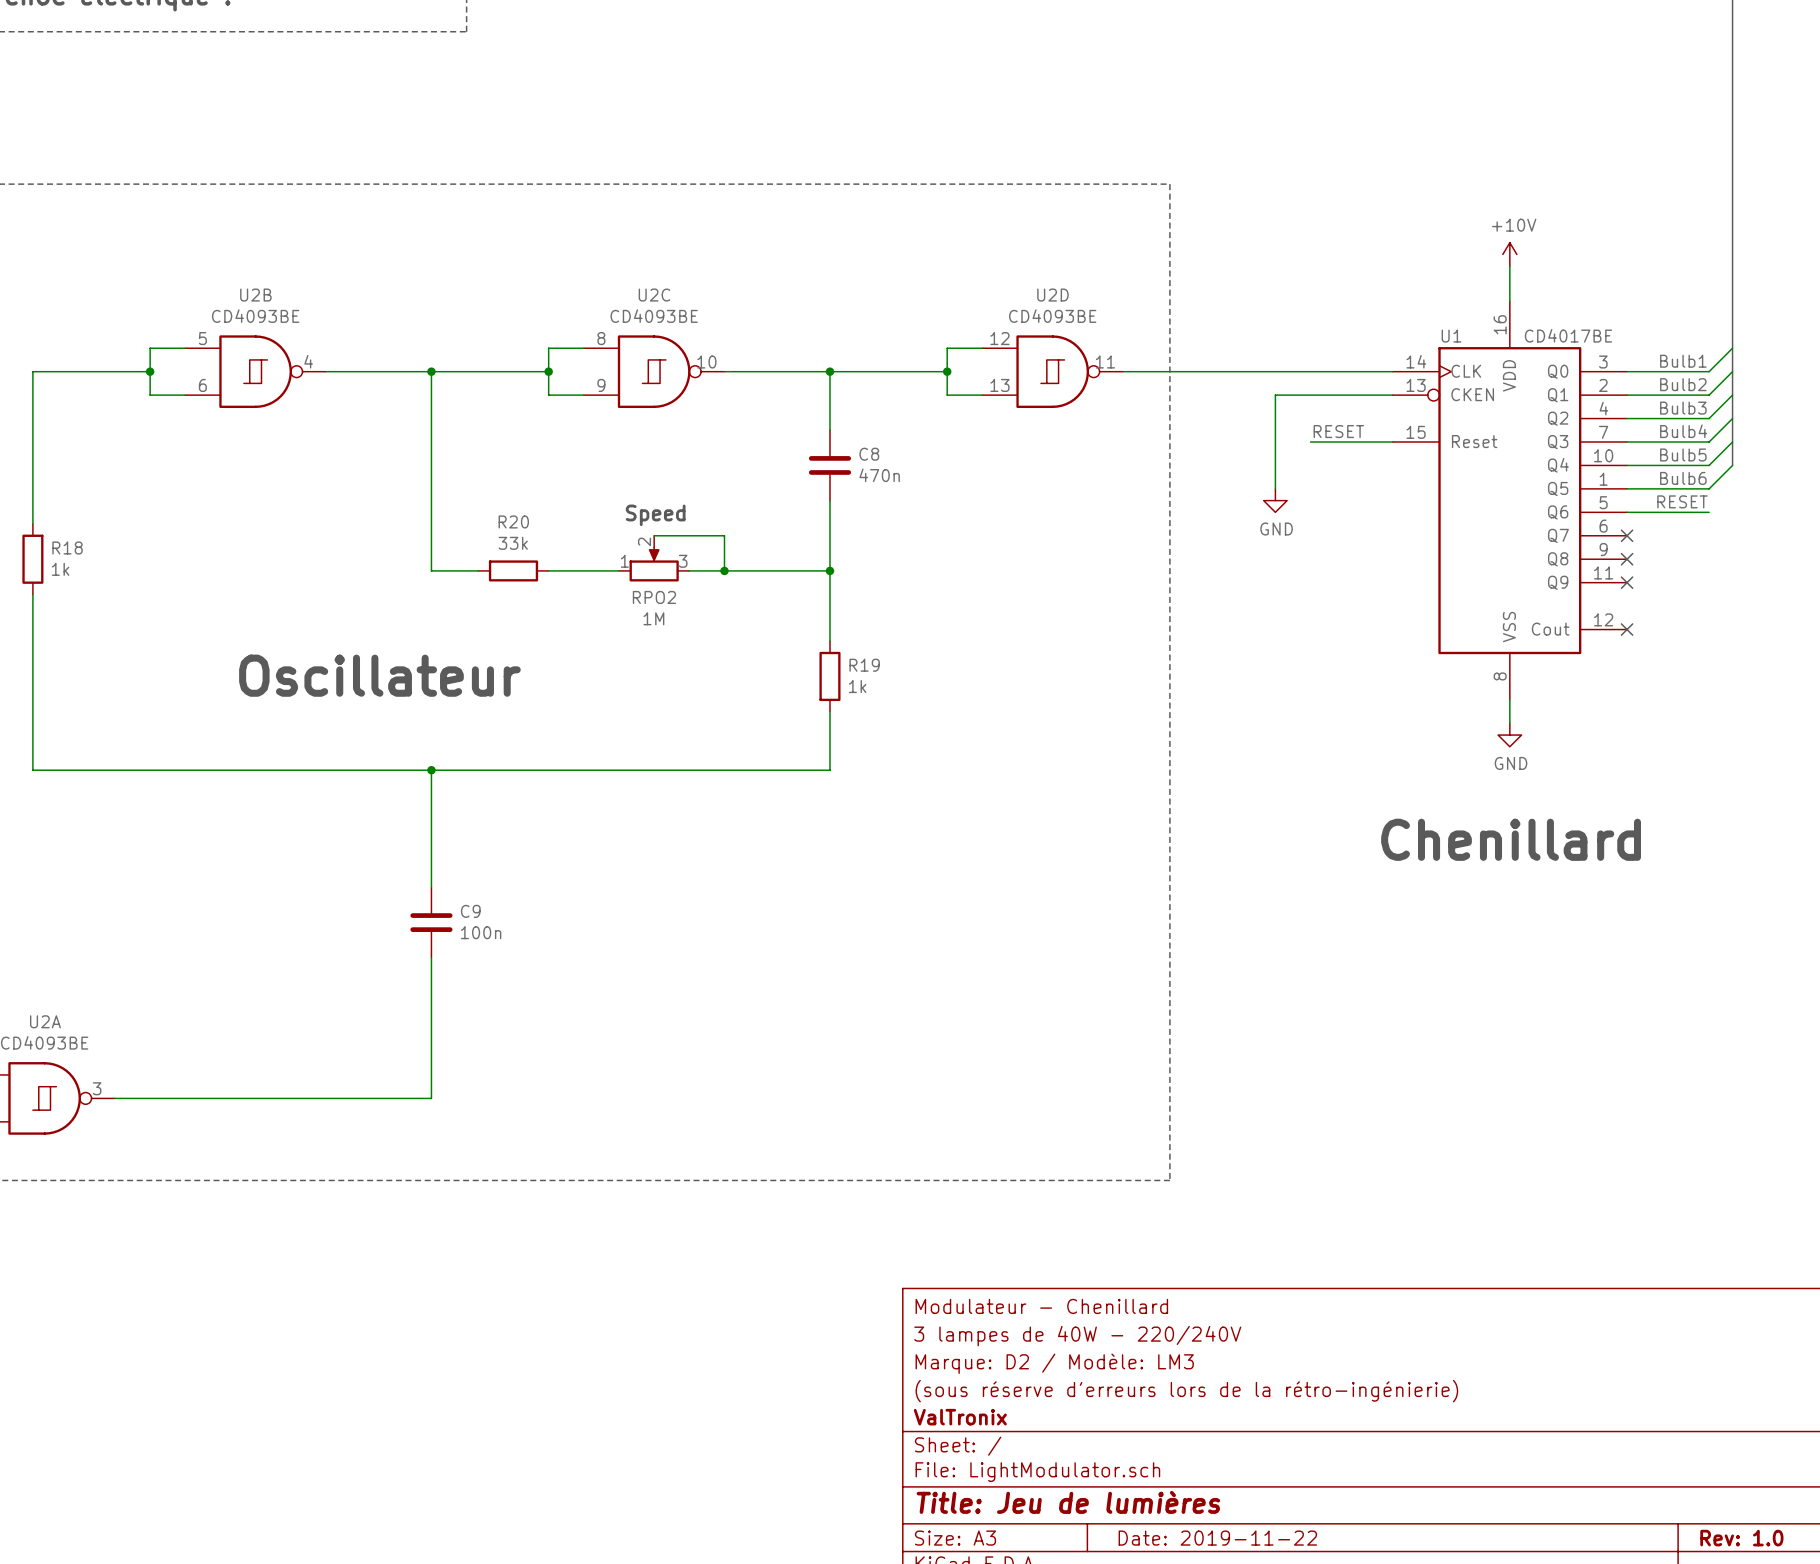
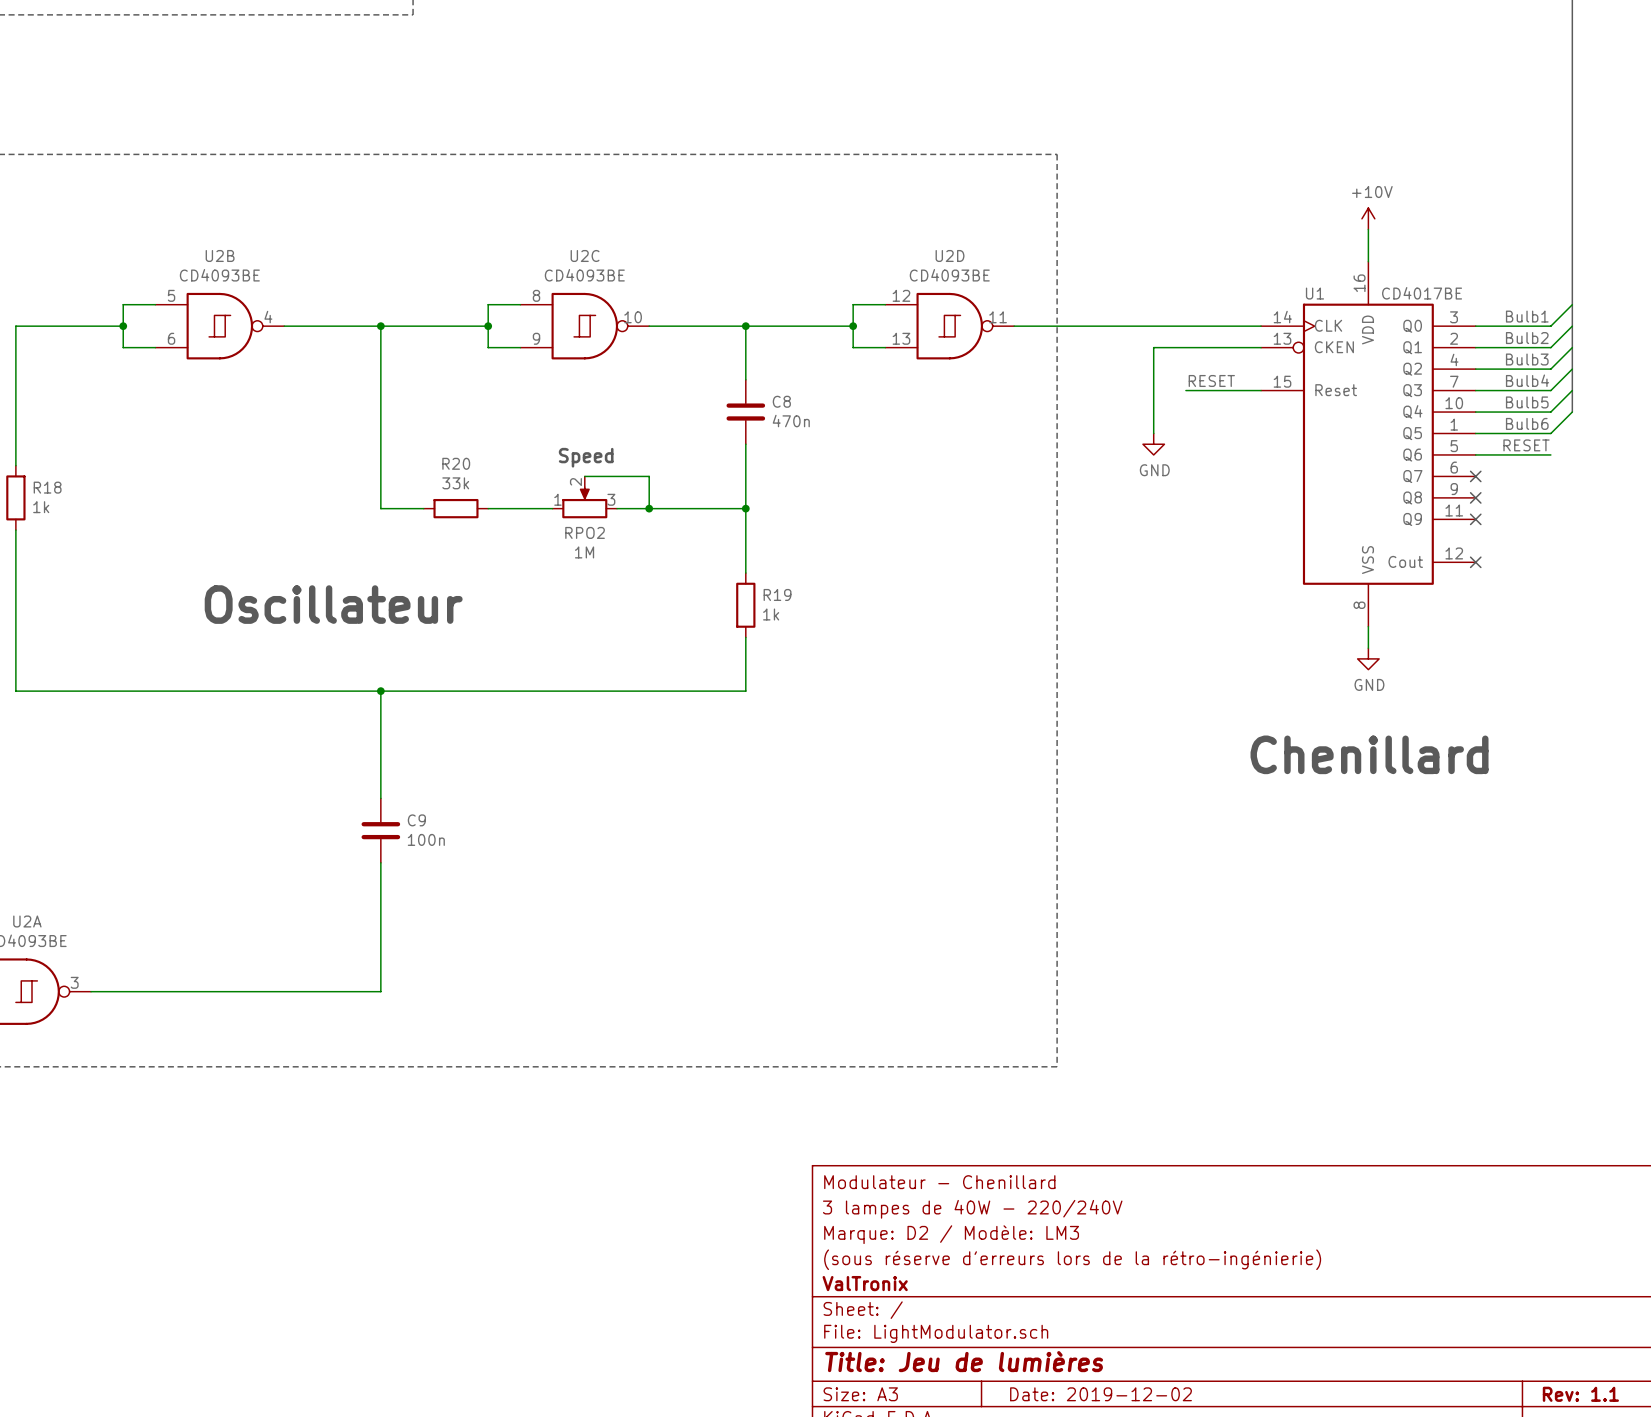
title block: Date: 2019-11-22 (1217, 1538) -> Date: 2019-12-02 (1101, 1394)
title block: Rev: 1.0 (1741, 1538) -> Rev: 1.1 (1580, 1394)

